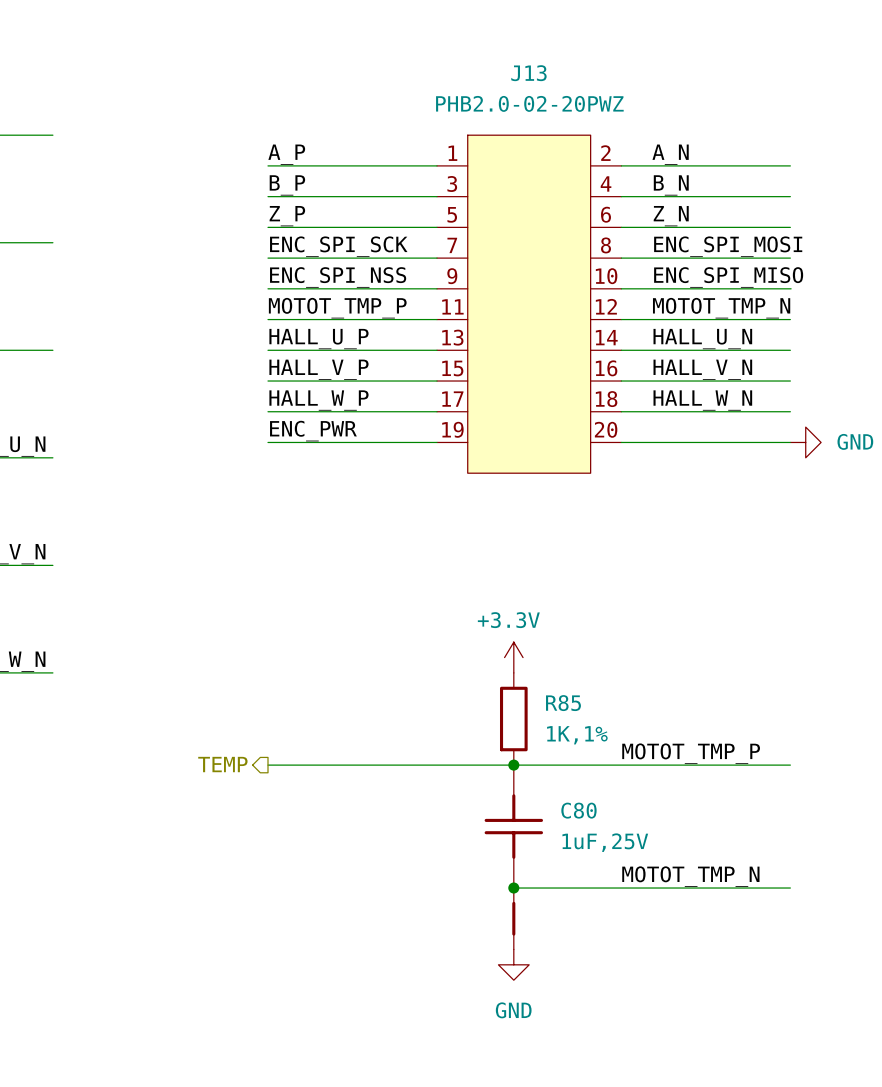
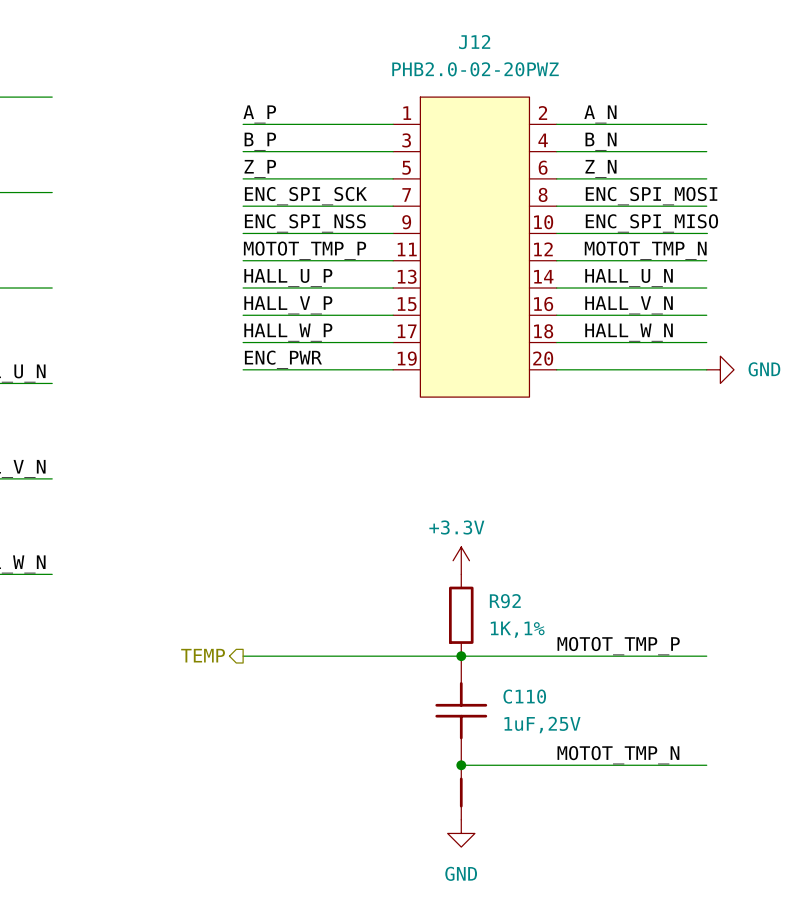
J13 name: J13 (528, 73) -> J12 (474, 42)
R85 name: R85 (563, 703) -> R92 (505, 601)
C80 name: C80 (578, 810) -> C110 (524, 696)

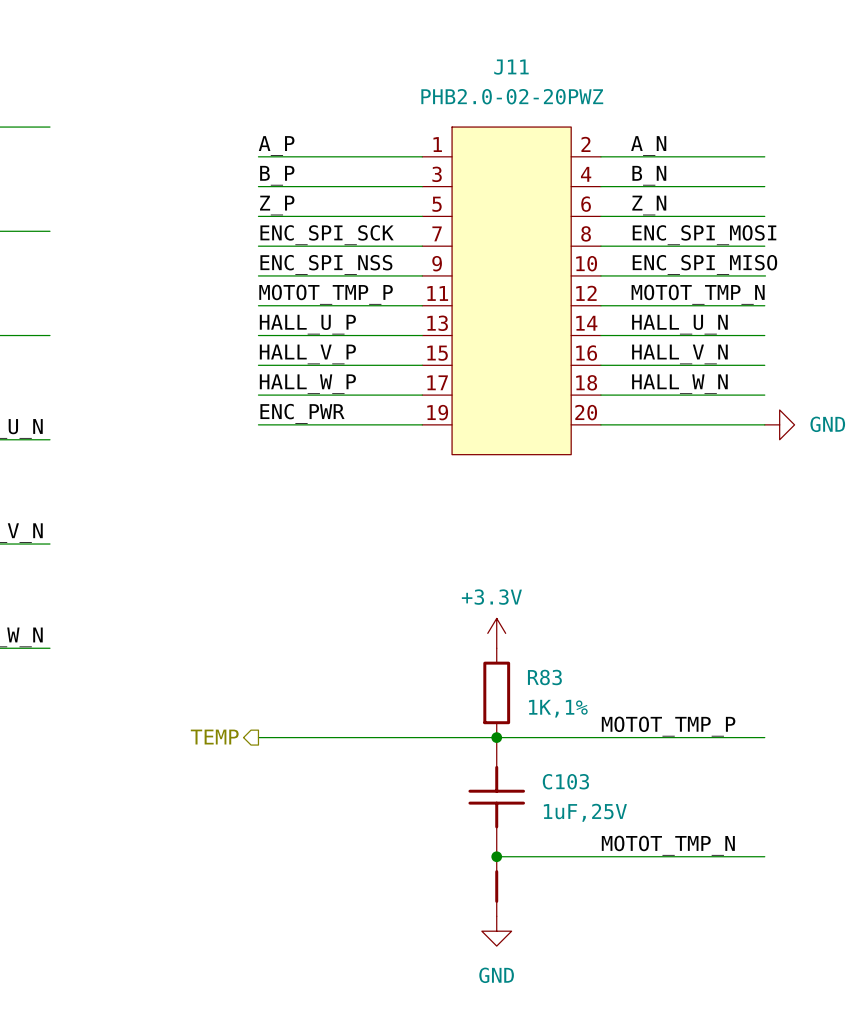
J12 name: J12 (474, 42) -> J11 (511, 67)
R92 name: R92 (505, 601) -> R83 (544, 677)
C110 name: C110 (524, 696) -> C103 (565, 781)

